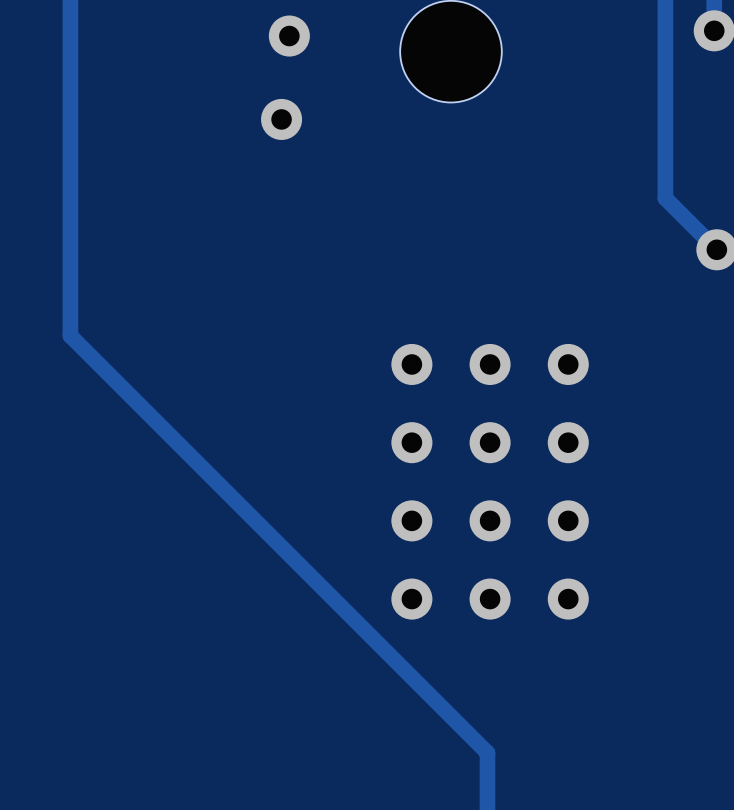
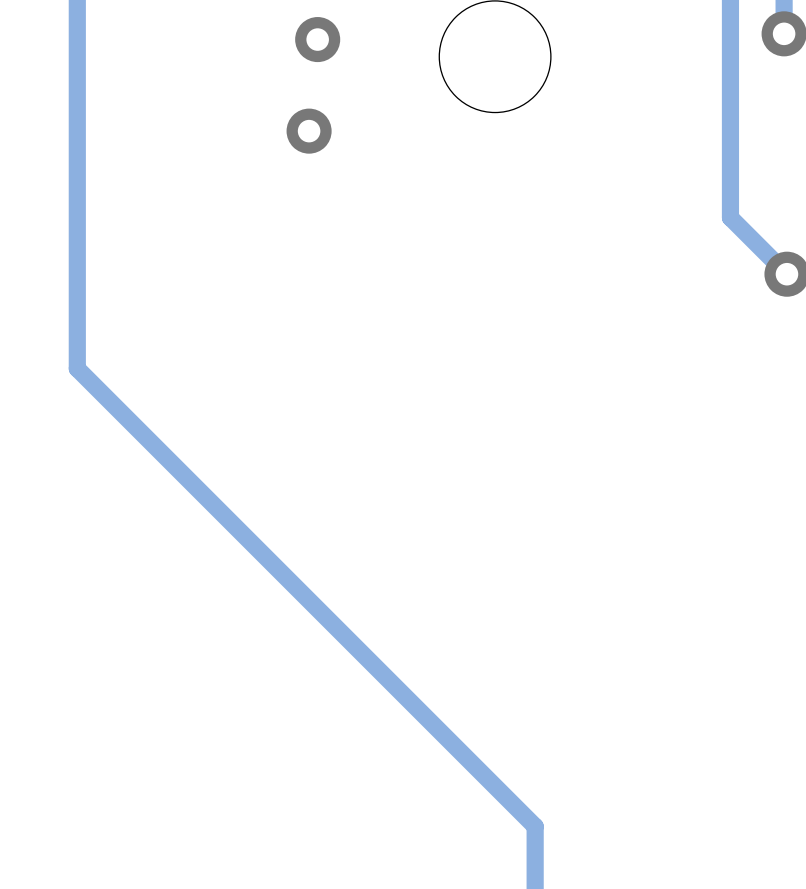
via: (411, 364) -> none
via: (490, 364) -> none
via: (568, 364) -> none
via: (411, 442) -> none
via: (490, 442) -> none
via: (568, 442) -> none
via: (411, 520) -> none
via: (490, 520) -> none
via: (568, 520) -> none
via: (411, 599) -> none
via: (490, 599) -> none
via: (568, 599) -> none

